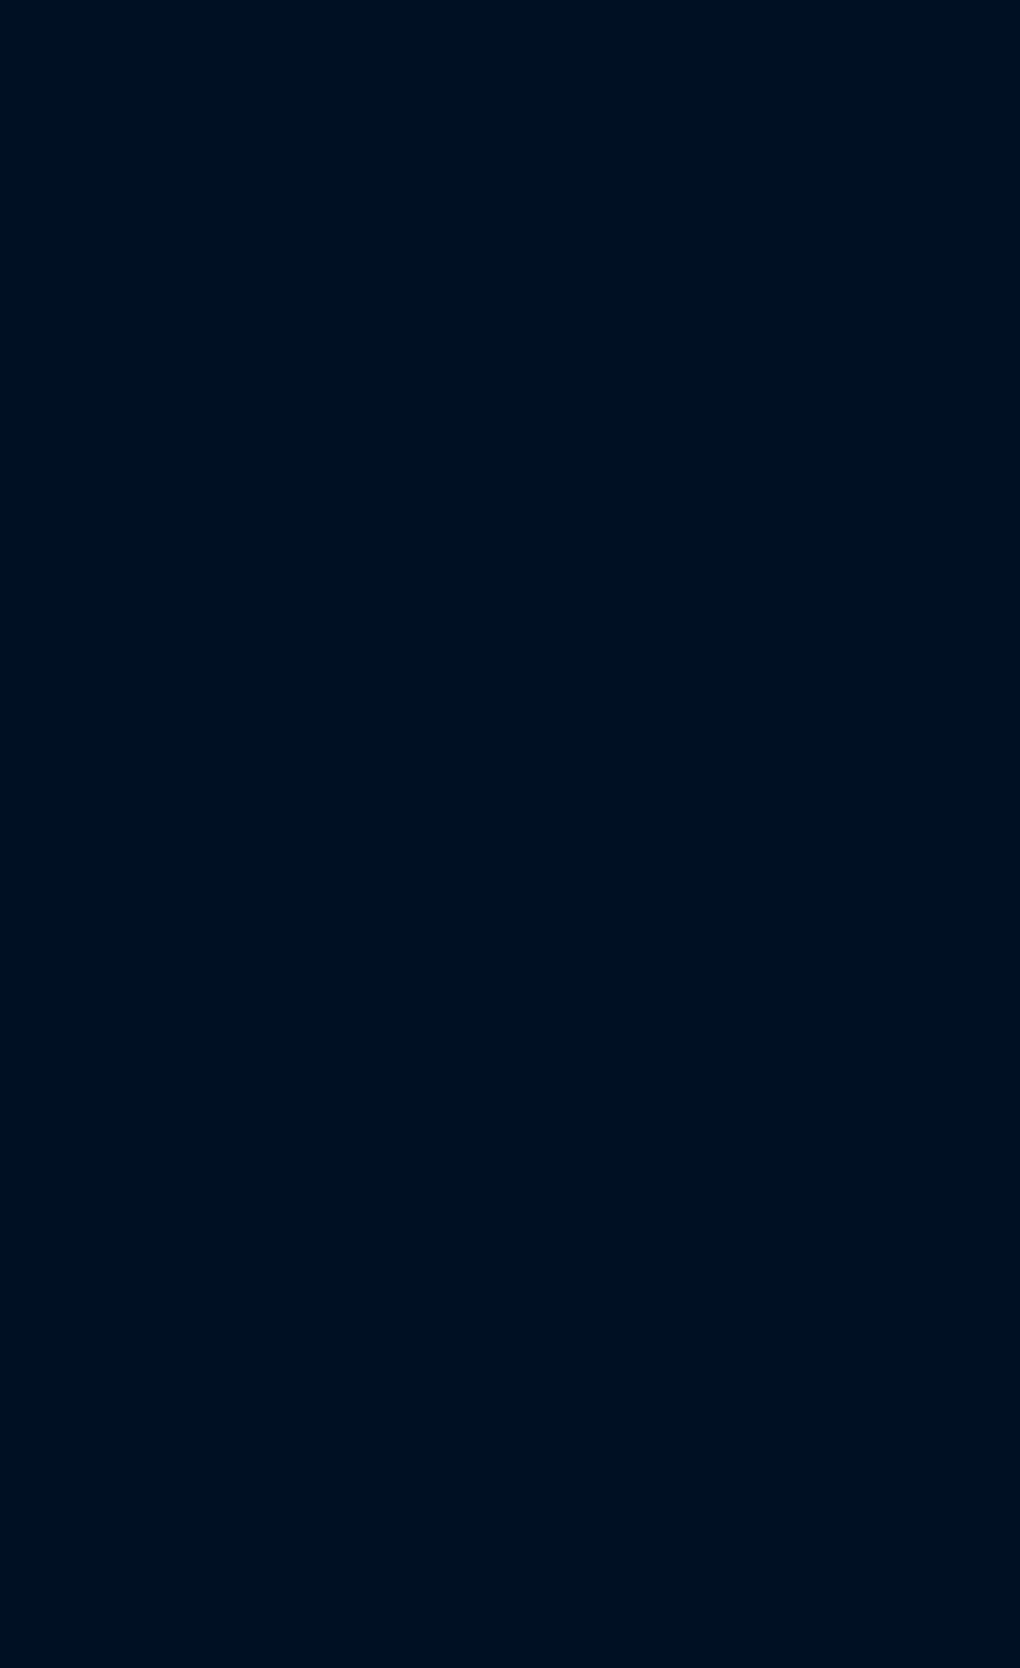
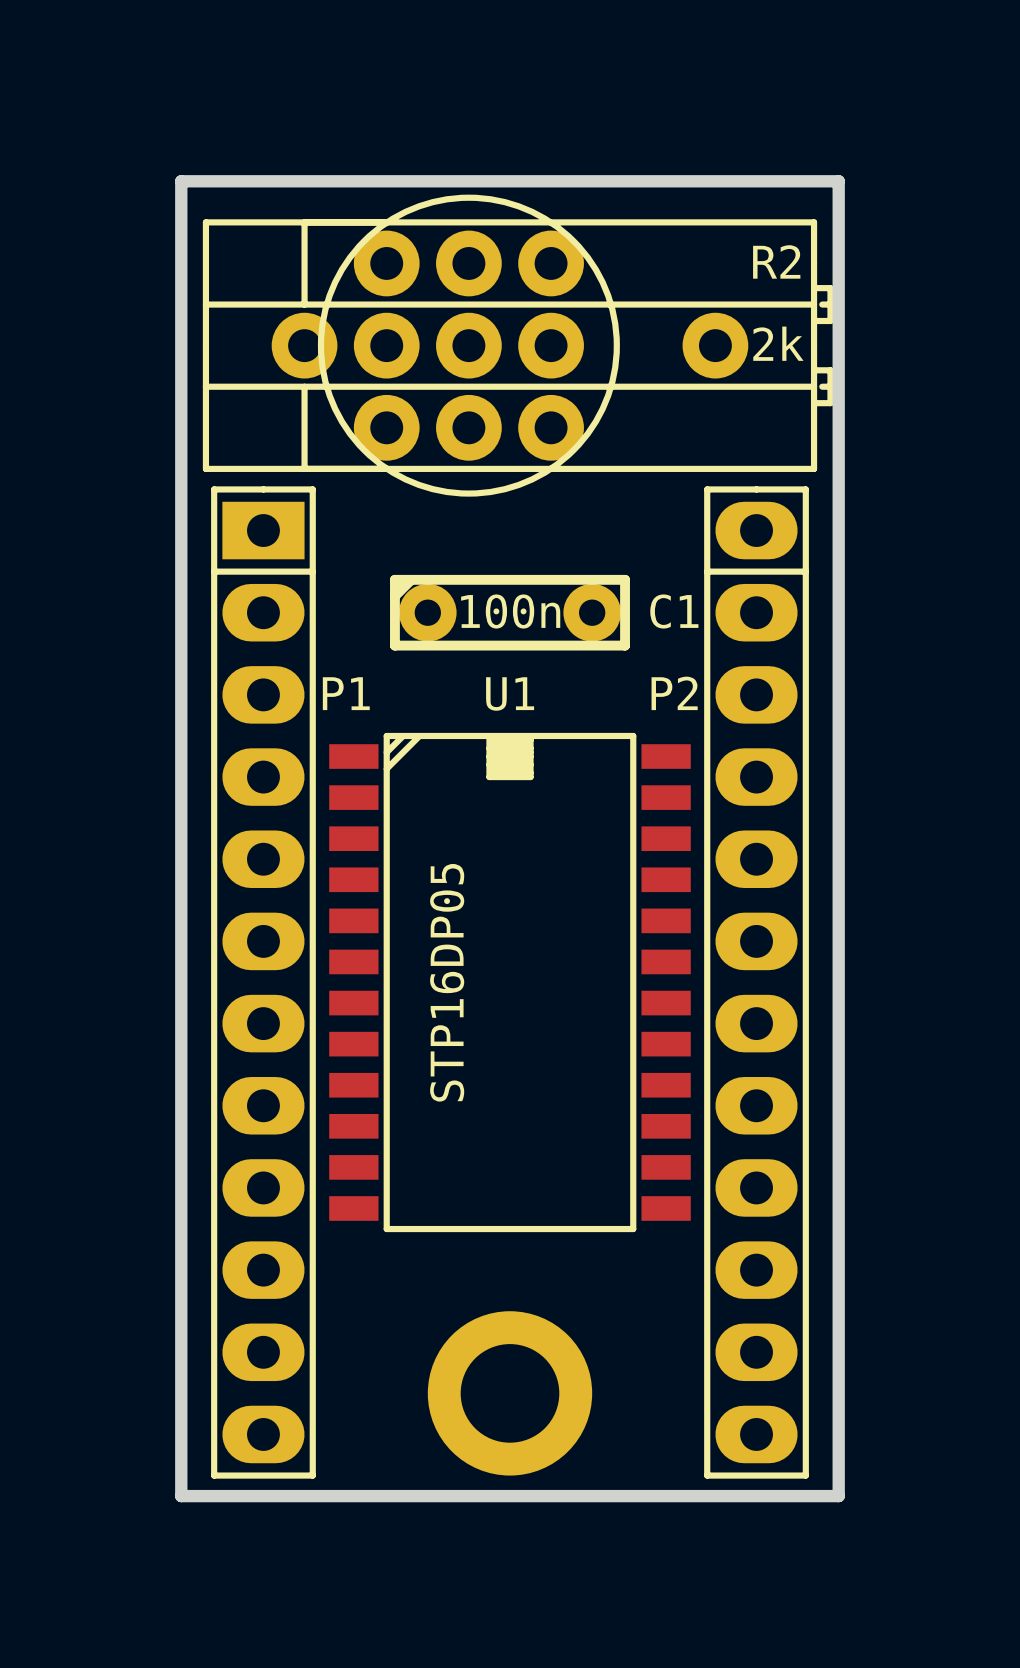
board edge: none -> (181, 181) (181, 1496) (838, 1496) (838, 181) (181, 181)
R2: none -> 2k (518, 345)
C1: none -> 100n (509, 612)
P1: none -> (263, 982)
U1: none -> STP16DP05 (509, 982)
P2: none -> (756, 982)
part: none -> (509, 1393)

